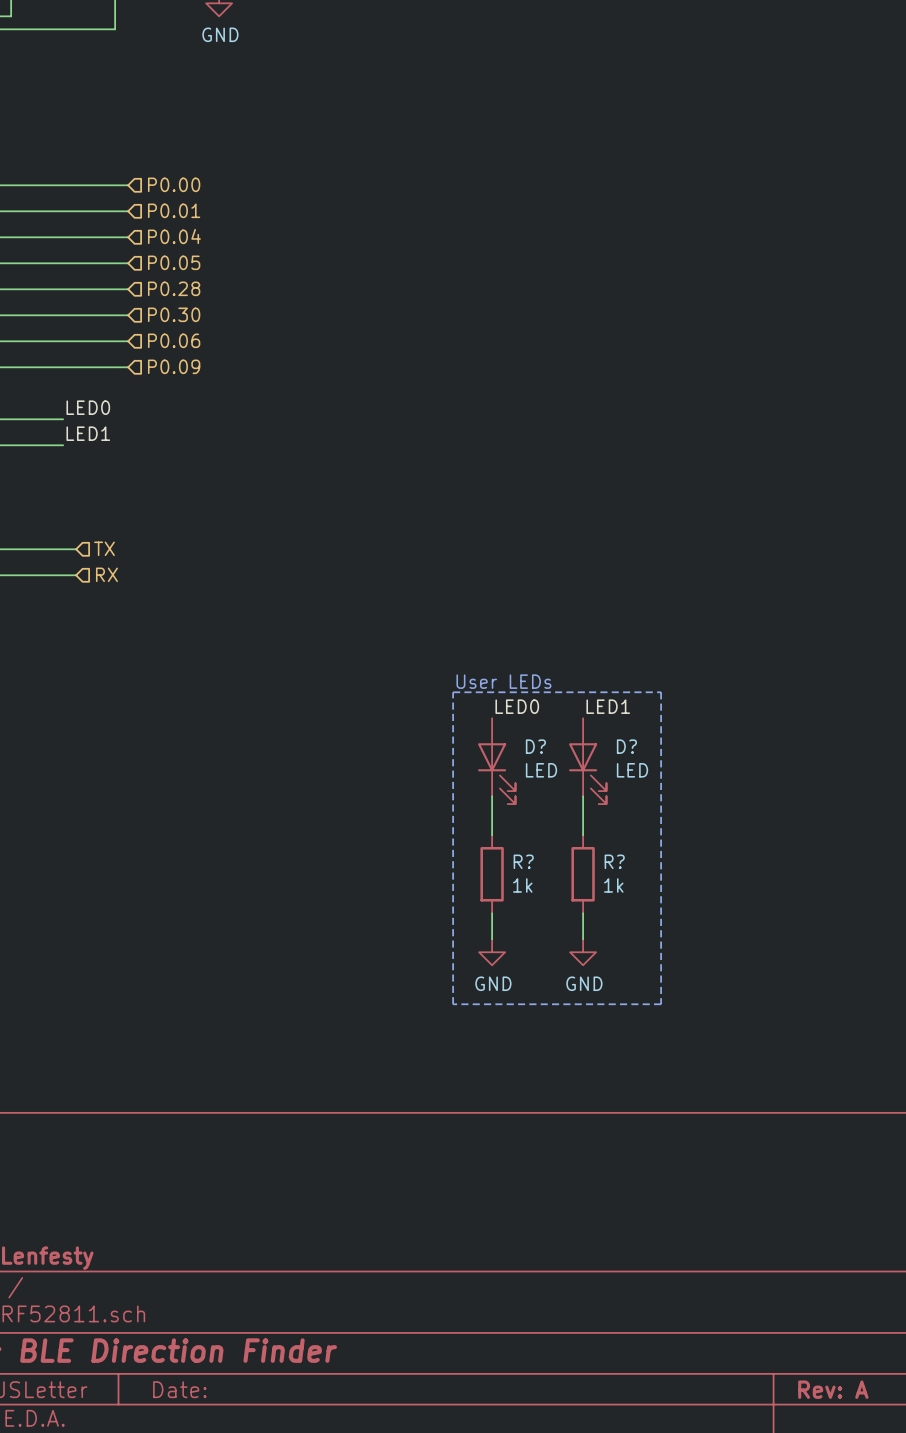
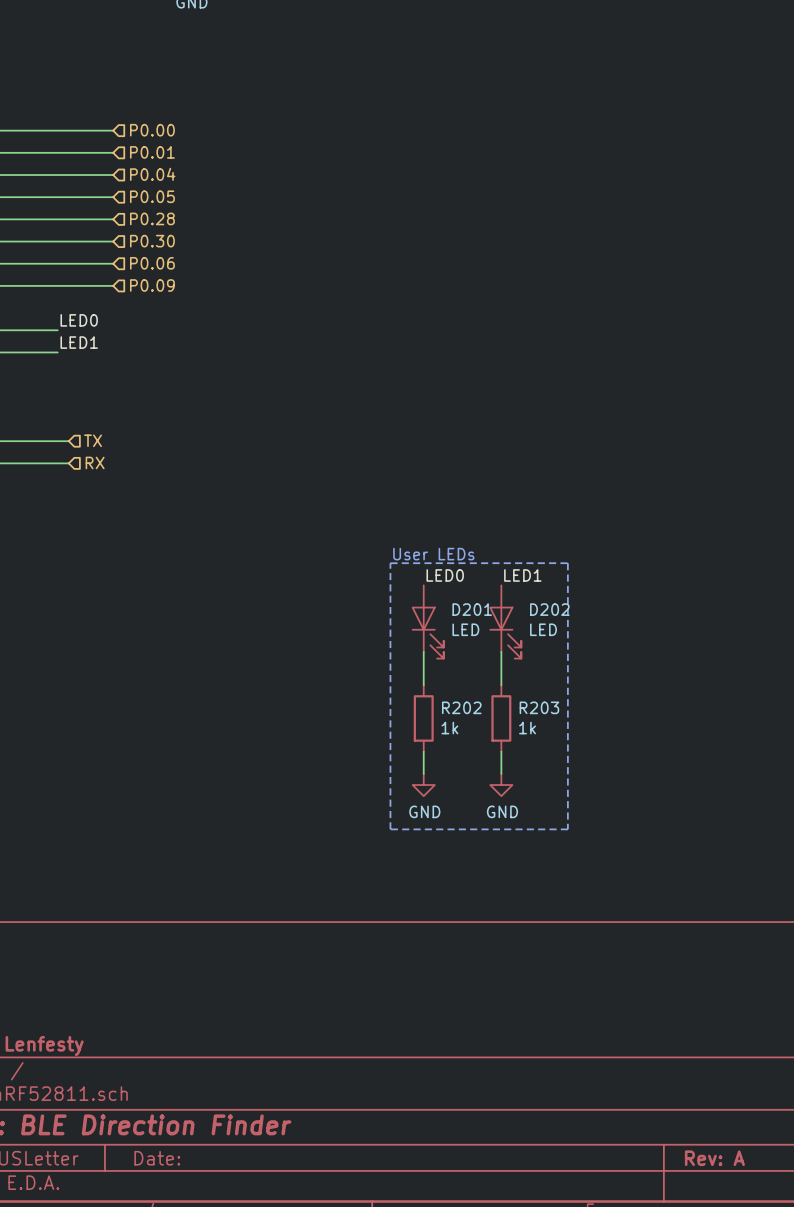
D? name: D? (535, 746) -> D201 (472, 609)
D? name: D? (626, 746) -> D202 (549, 609)
R? name: R? (523, 861) -> R202 (461, 707)
R? name: R? (614, 861) -> R203 (539, 707)

